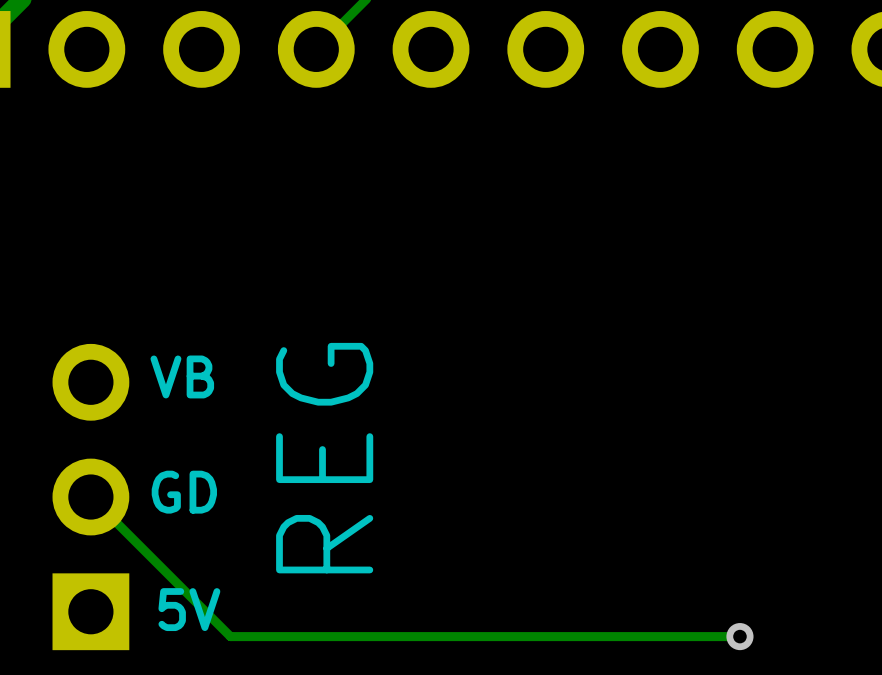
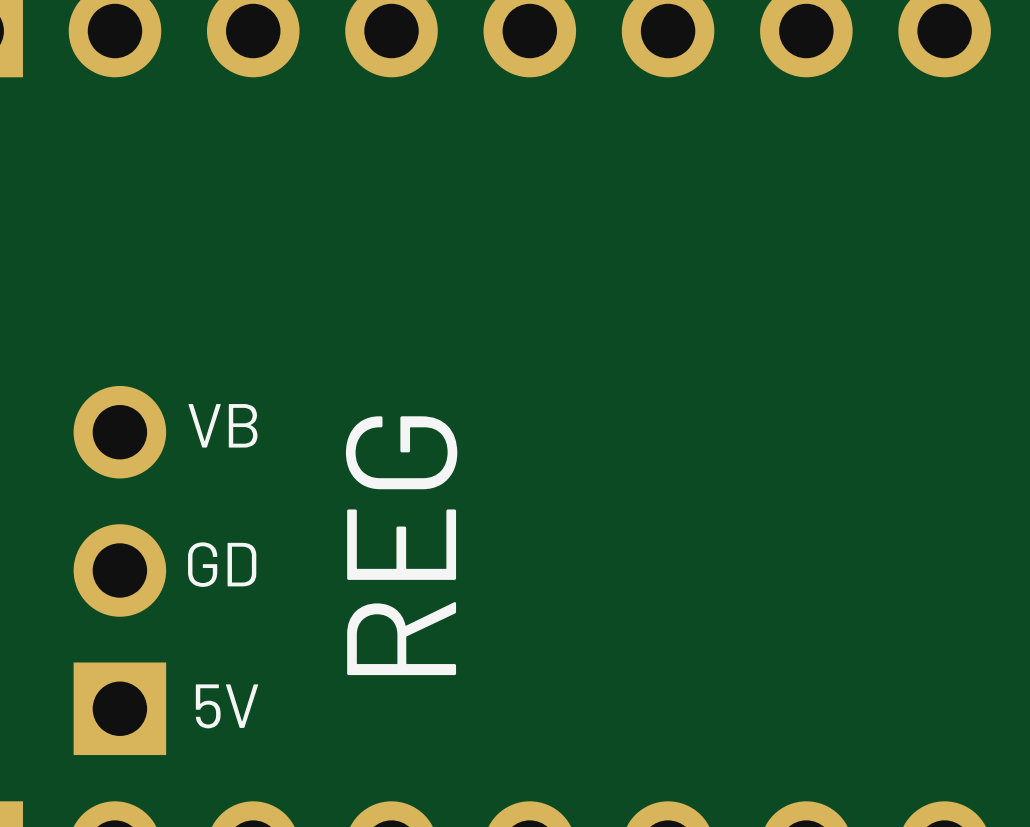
track: (90, 497) (230, 636) (739, 636) -> none
via: (739, 636) -> none

